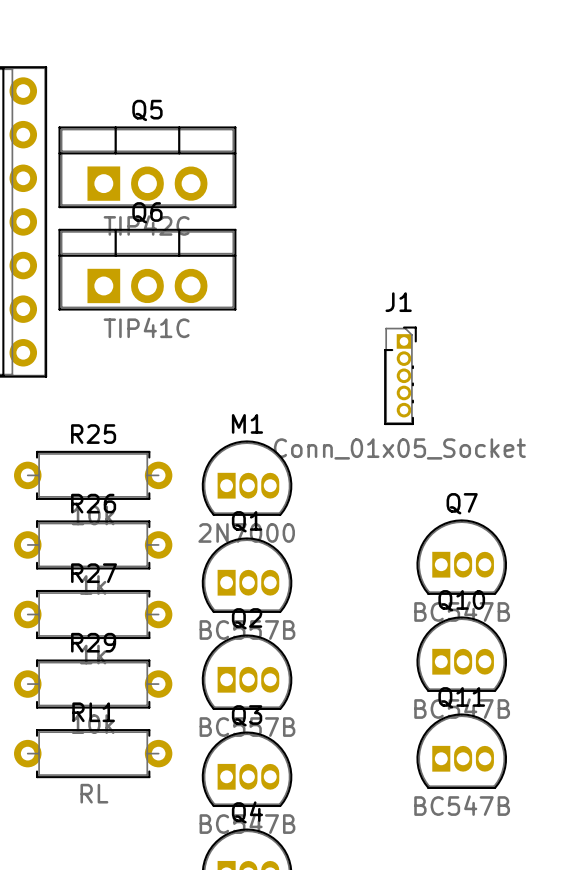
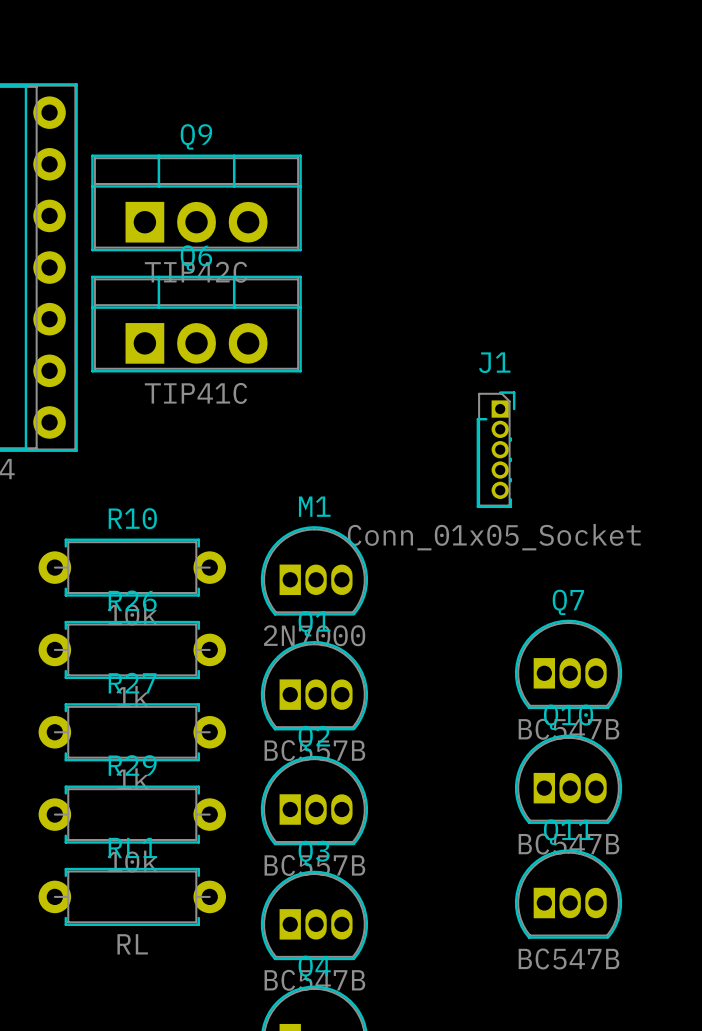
Q5 name: Q5 (147, 110) -> Q9 (196, 136)
R25 name: R25 (93, 434) -> R10 (132, 518)

